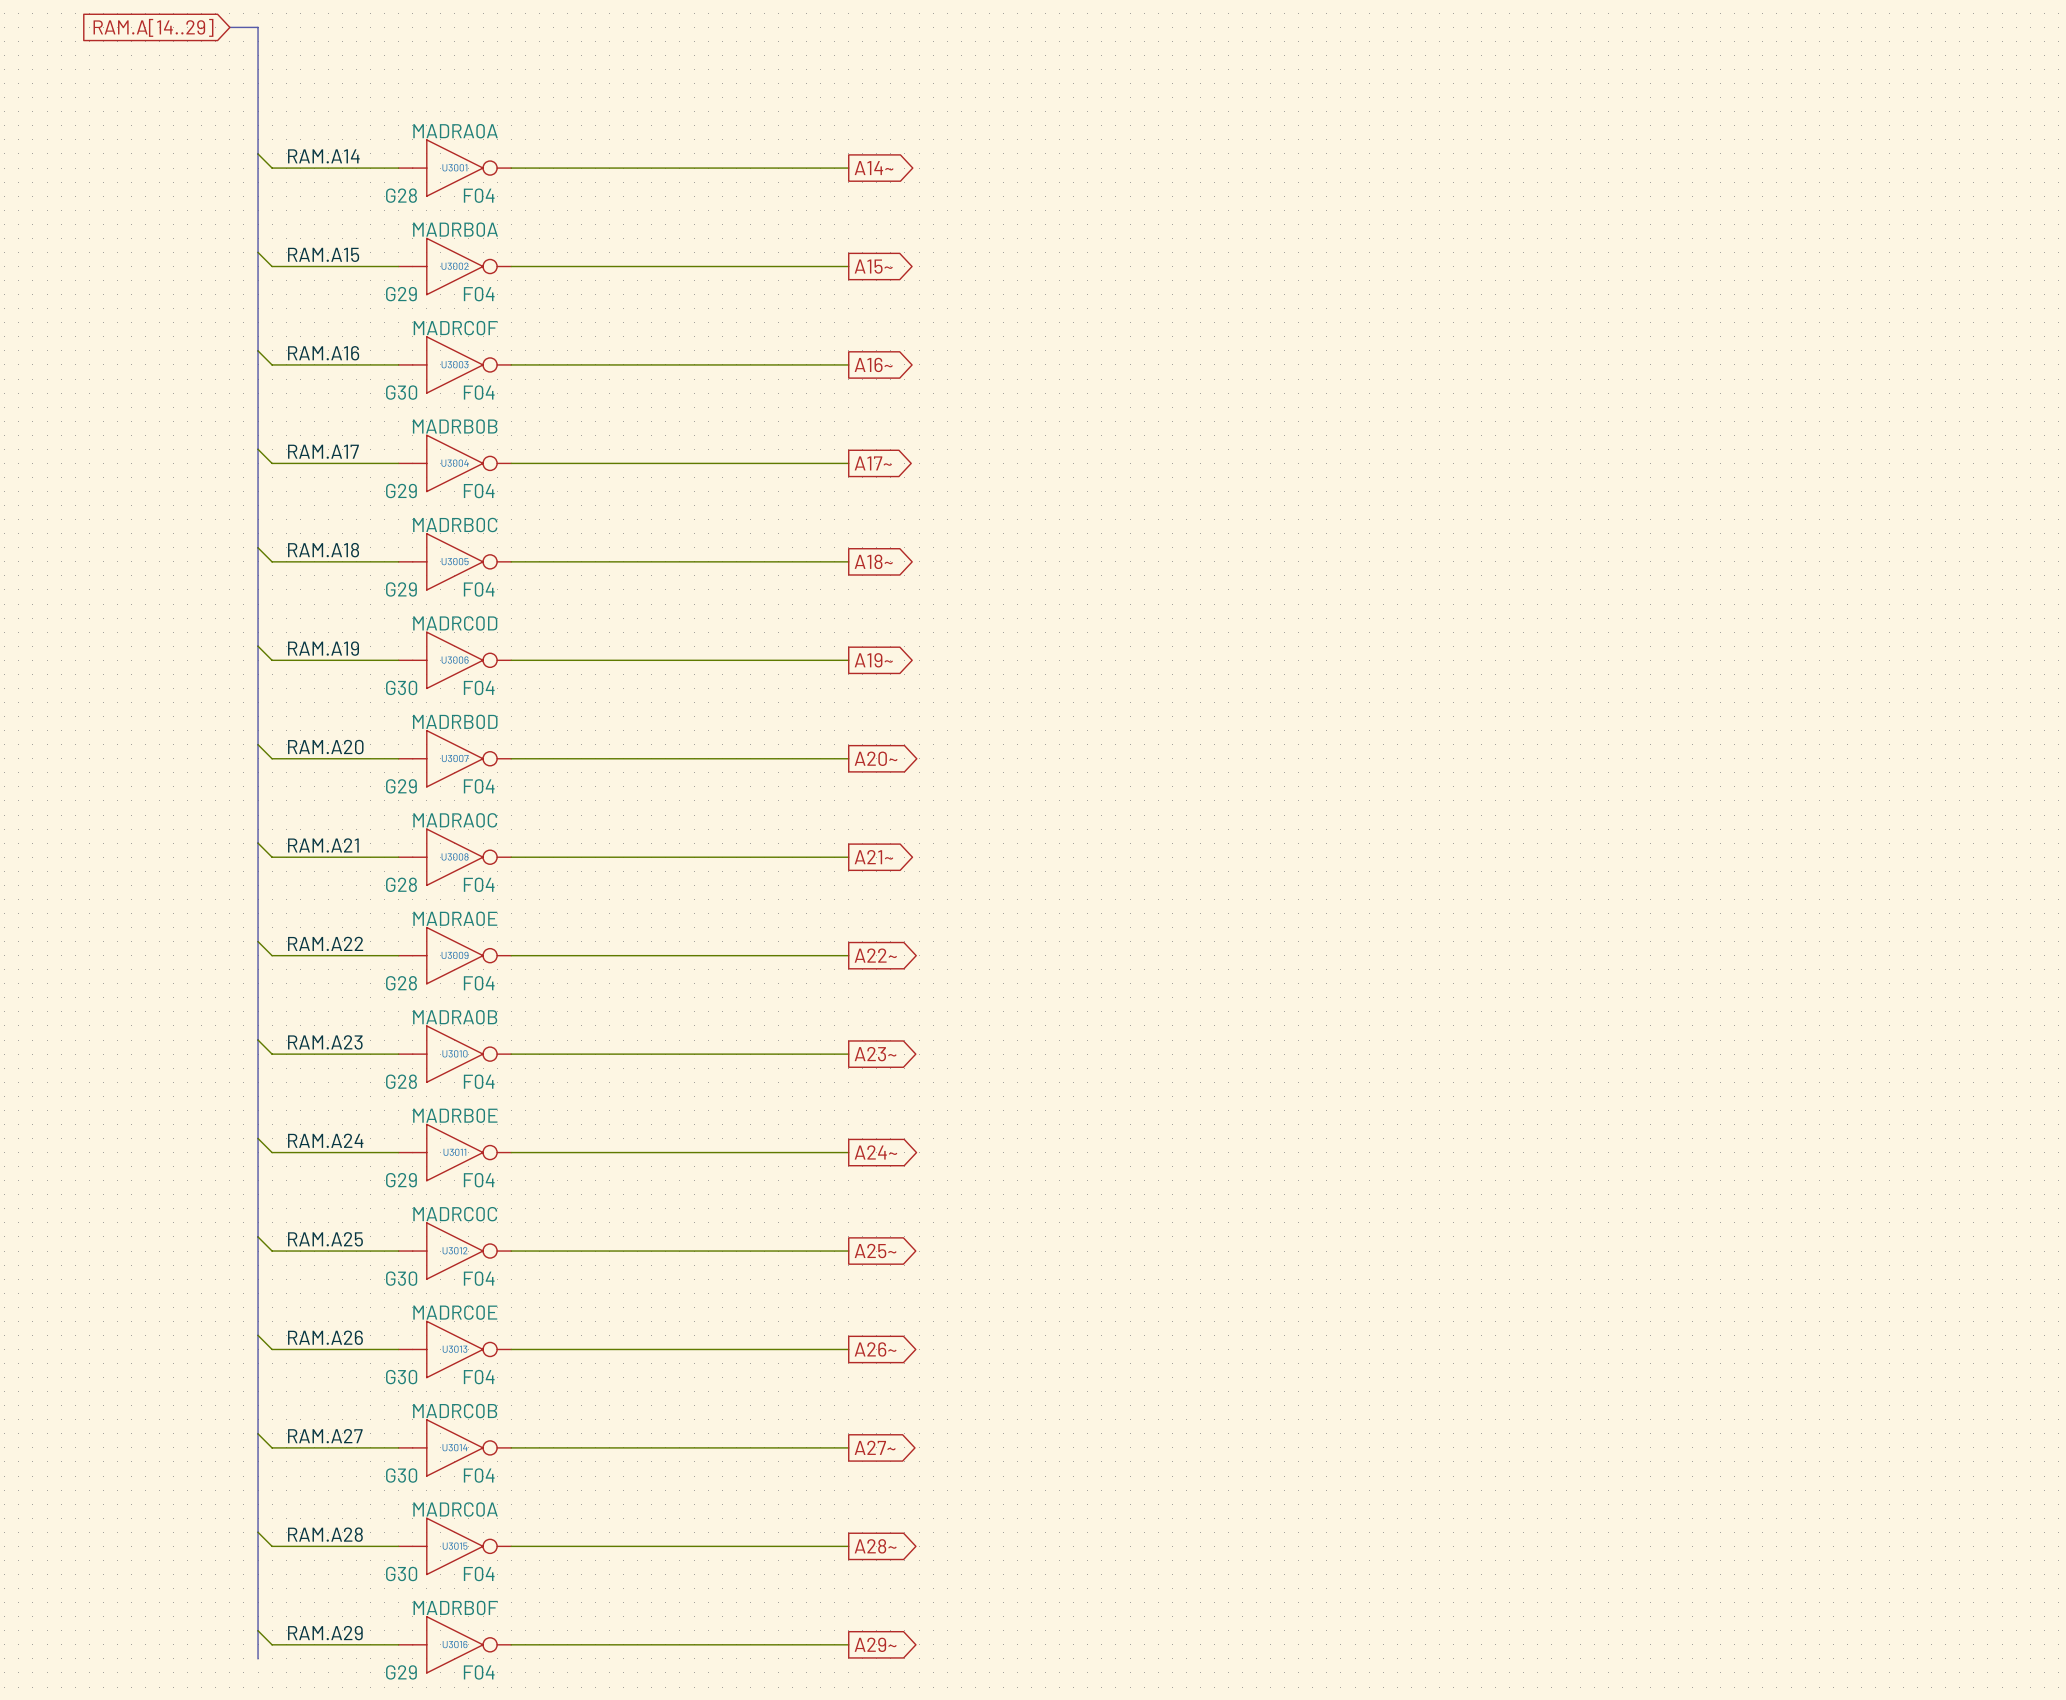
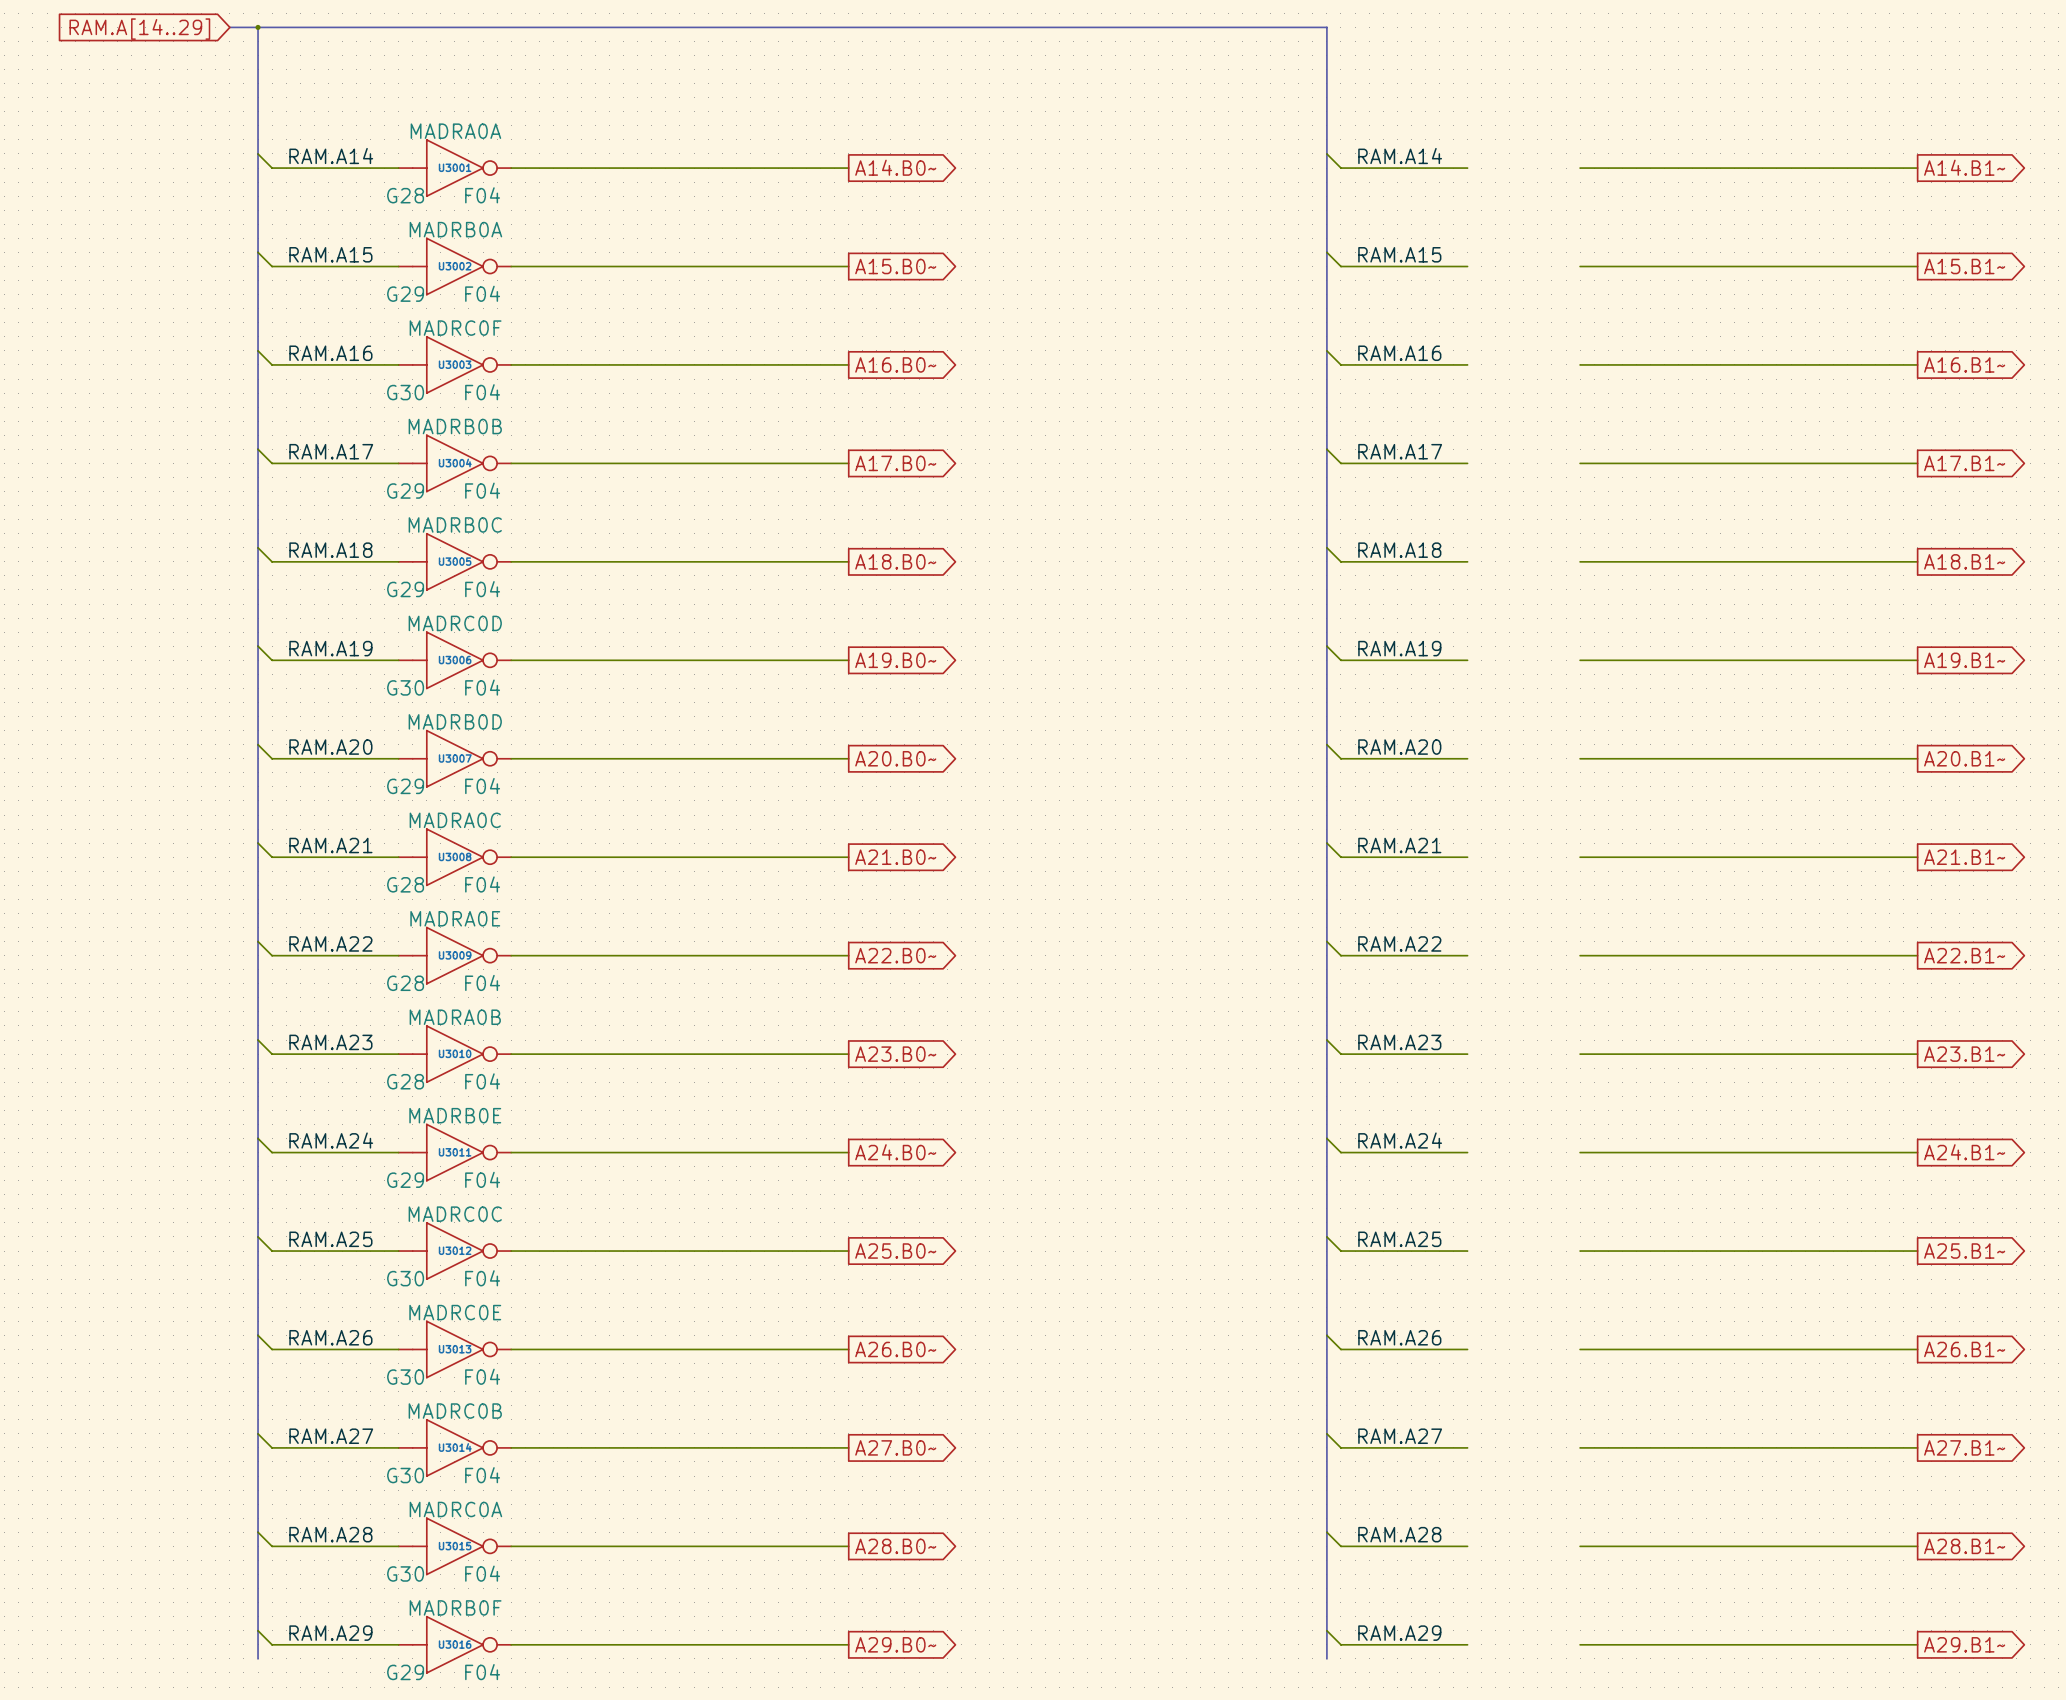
bus: none -> (258, 27) (1326, 27) (1326, 1658)
junction: none -> (258, 27)
wire: none -> (1326, 153) (1340, 168) (1467, 168)
label: none -> RAM.A14 (1400, 156)
global label: A14~ (874, 168) -> A14.B0~ (895, 167)
wire: none -> (1580, 168) (1917, 168)
global label: none -> A14.B1~ (1964, 167)
wire: none -> (1326, 252) (1340, 266) (1467, 266)
label: none -> RAM.A15 (1399, 254)
global label: A15~ (873, 266) -> A15.B0~ (895, 266)
wire: none -> (1580, 266) (1917, 266)
global label: none -> A15.B1~ (1964, 266)
wire: none -> (1326, 350) (1340, 364) (1467, 364)
label: none -> RAM.A16 (1399, 353)
global label: A16~ (873, 364) -> A16.B0~ (895, 364)
wire: none -> (1580, 364) (1917, 364)
global label: none -> A16.B1~ (1964, 364)
wire: none -> (1326, 449) (1340, 463) (1467, 463)
label: none -> RAM.A17 (1400, 451)
global label: A17~ (873, 463) -> A17.B0~ (895, 463)
wire: none -> (1580, 463) (1917, 463)
global label: none -> A17.B1~ (1964, 463)
wire: none -> (1326, 547) (1340, 561) (1467, 561)
label: none -> RAM.A18 (1399, 550)
global label: A18~ (873, 561) -> A18.B0~ (895, 561)
wire: none -> (1580, 561) (1917, 561)
global label: none -> A18.B1~ (1964, 561)
wire: none -> (1326, 646) (1340, 660) (1467, 660)
label: none -> RAM.A19 (1399, 648)
global label: A19~ (873, 660) -> A19.B0~ (895, 660)
wire: none -> (1580, 660) (1917, 660)
global label: none -> A19.B1~ (1964, 660)
wire: none -> (1326, 744) (1340, 758) (1467, 758)
label: none -> RAM.A20 (1399, 747)
global label: A20~ (876, 758) -> A20.B0~ (895, 758)
wire: none -> (1580, 758) (1917, 758)
global label: none -> A20.B1~ (1964, 758)
wire: none -> (1326, 843) (1340, 857) (1467, 857)
label: none -> RAM.A21 (1399, 845)
global label: A21~ (873, 857) -> A21.B0~ (895, 857)
wire: none -> (1580, 857) (1917, 857)
global label: none -> A21.B1~ (1964, 857)
wire: none -> (1326, 941) (1340, 955) (1467, 955)
label: none -> RAM.A22 (1399, 943)
global label: A22~ (875, 955) -> A22.B0~ (895, 955)
wire: none -> (1580, 955) (1917, 955)
global label: none -> A22.B1~ (1964, 955)
wire: none -> (1326, 1040) (1340, 1054) (1467, 1054)
label: none -> RAM.A23 (1399, 1042)
global label: A23~ (875, 1054) -> A23.B0~ (895, 1054)
wire: none -> (1580, 1054) (1917, 1054)
global label: none -> A23.B1~ (1964, 1054)
wire: none -> (1326, 1138) (1340, 1152) (1467, 1152)
label: none -> RAM.A24 (1400, 1140)
global label: A24~ (875, 1152) -> A24.B0~ (895, 1152)
wire: none -> (1580, 1152) (1917, 1152)
global label: none -> A24.B1~ (1964, 1152)
wire: none -> (1326, 1236) (1340, 1251) (1467, 1251)
label: none -> RAM.A25 (1399, 1239)
global label: A25~ (875, 1251) -> A25.B0~ (895, 1251)
wire: none -> (1580, 1251) (1917, 1251)
global label: none -> A25.B1~ (1964, 1251)
wire: none -> (1326, 1335) (1340, 1349) (1467, 1349)
label: none -> RAM.A26 (1399, 1337)
global label: A26~ (875, 1349) -> A26.B0~ (895, 1349)
wire: none -> (1580, 1349) (1917, 1349)
global label: none -> A26.B1~ (1964, 1349)
wire: none -> (1326, 1433) (1340, 1447) (1467, 1447)
label: none -> RAM.A27 (1400, 1436)
global label: A27~ (875, 1447) -> A27.B0~ (895, 1447)
wire: none -> (1580, 1447) (1917, 1447)
global label: none -> A27.B1~ (1964, 1447)
wire: none -> (1326, 1532) (1340, 1546) (1467, 1546)
label: none -> RAM.A28 (1399, 1534)
global label: A28~ (875, 1546) -> A28.B0~ (895, 1546)
wire: none -> (1580, 1546) (1917, 1546)
global label: none -> A28.B1~ (1964, 1546)
wire: none -> (1326, 1630) (1340, 1644) (1467, 1644)
label: none -> RAM.A29 (1399, 1633)
global label: A29~ (875, 1644) -> A29.B0~ (895, 1644)
wire: none -> (1580, 1644) (1917, 1644)
global label: none -> A29.B1~ (1964, 1644)

